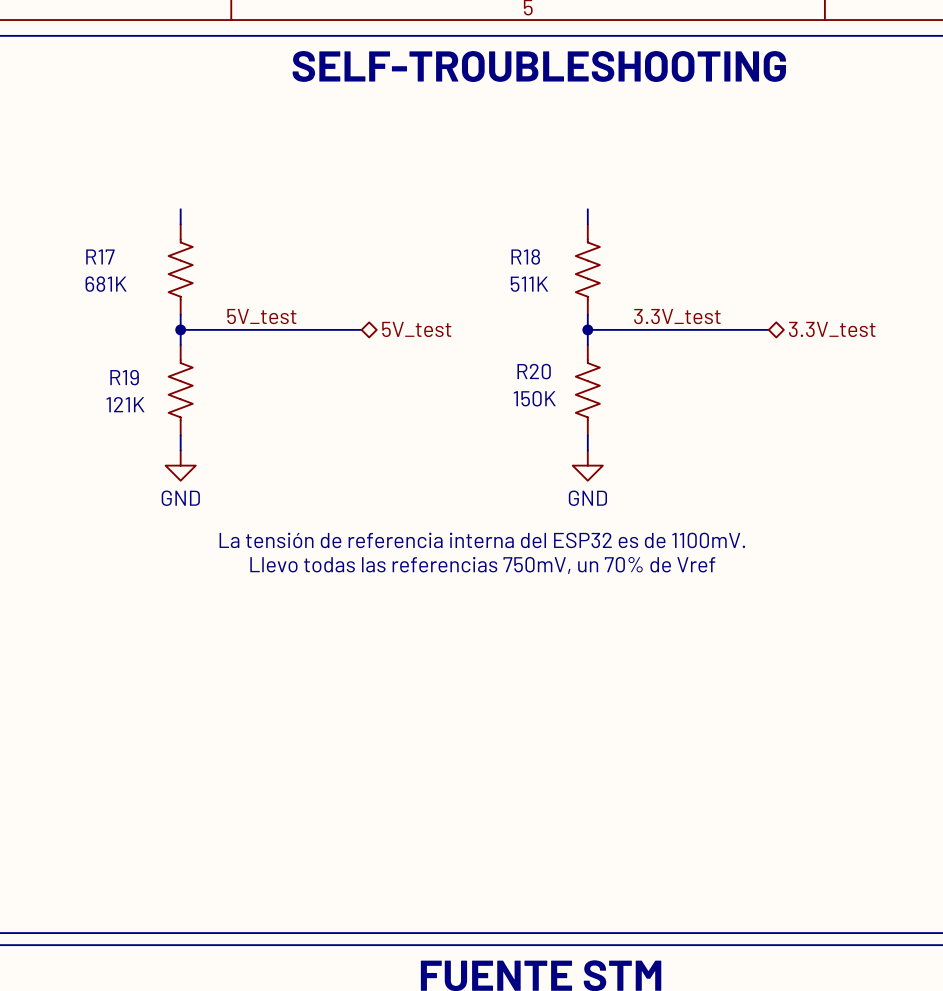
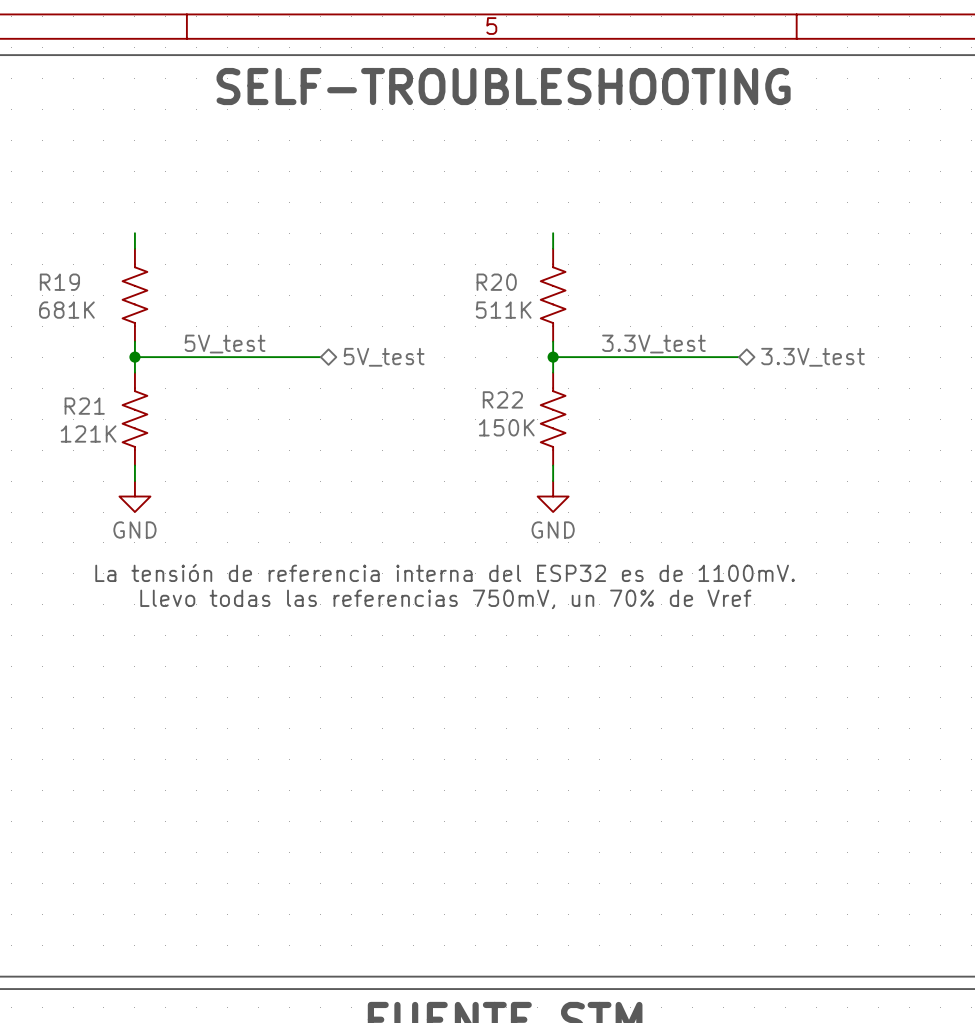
R17 name: R17 (100, 256) -> R19 (59, 282)
R18 name: R18 (525, 256) -> R20 (496, 282)
R20 name: R20 (534, 371) -> R22 (502, 399)
R19 name: R19 (124, 377) -> R21 (84, 406)

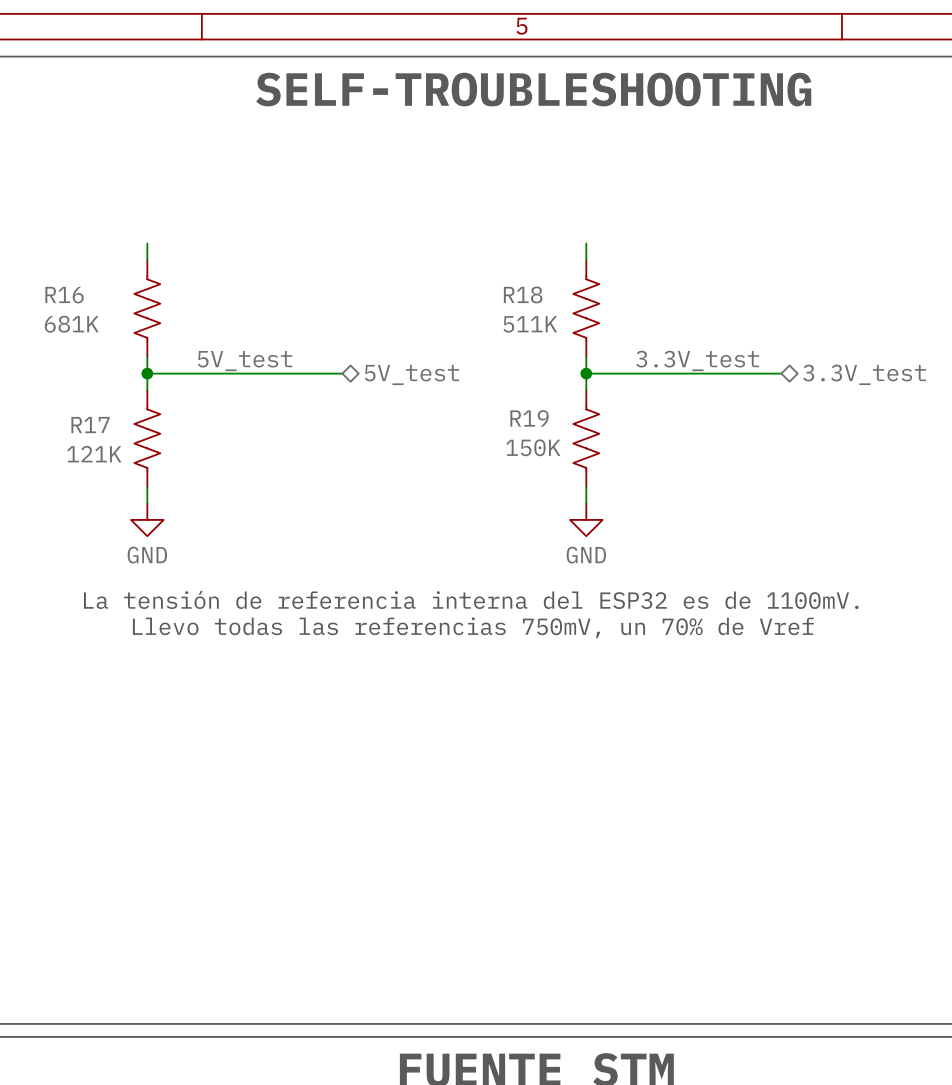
R19 name: R19 (59, 282) -> R16 (64, 295)
R20 name: R20 (496, 282) -> R18 (523, 294)
R22 name: R22 (502, 399) -> R19 (529, 418)
R21 name: R21 (84, 406) -> R17 (90, 425)

